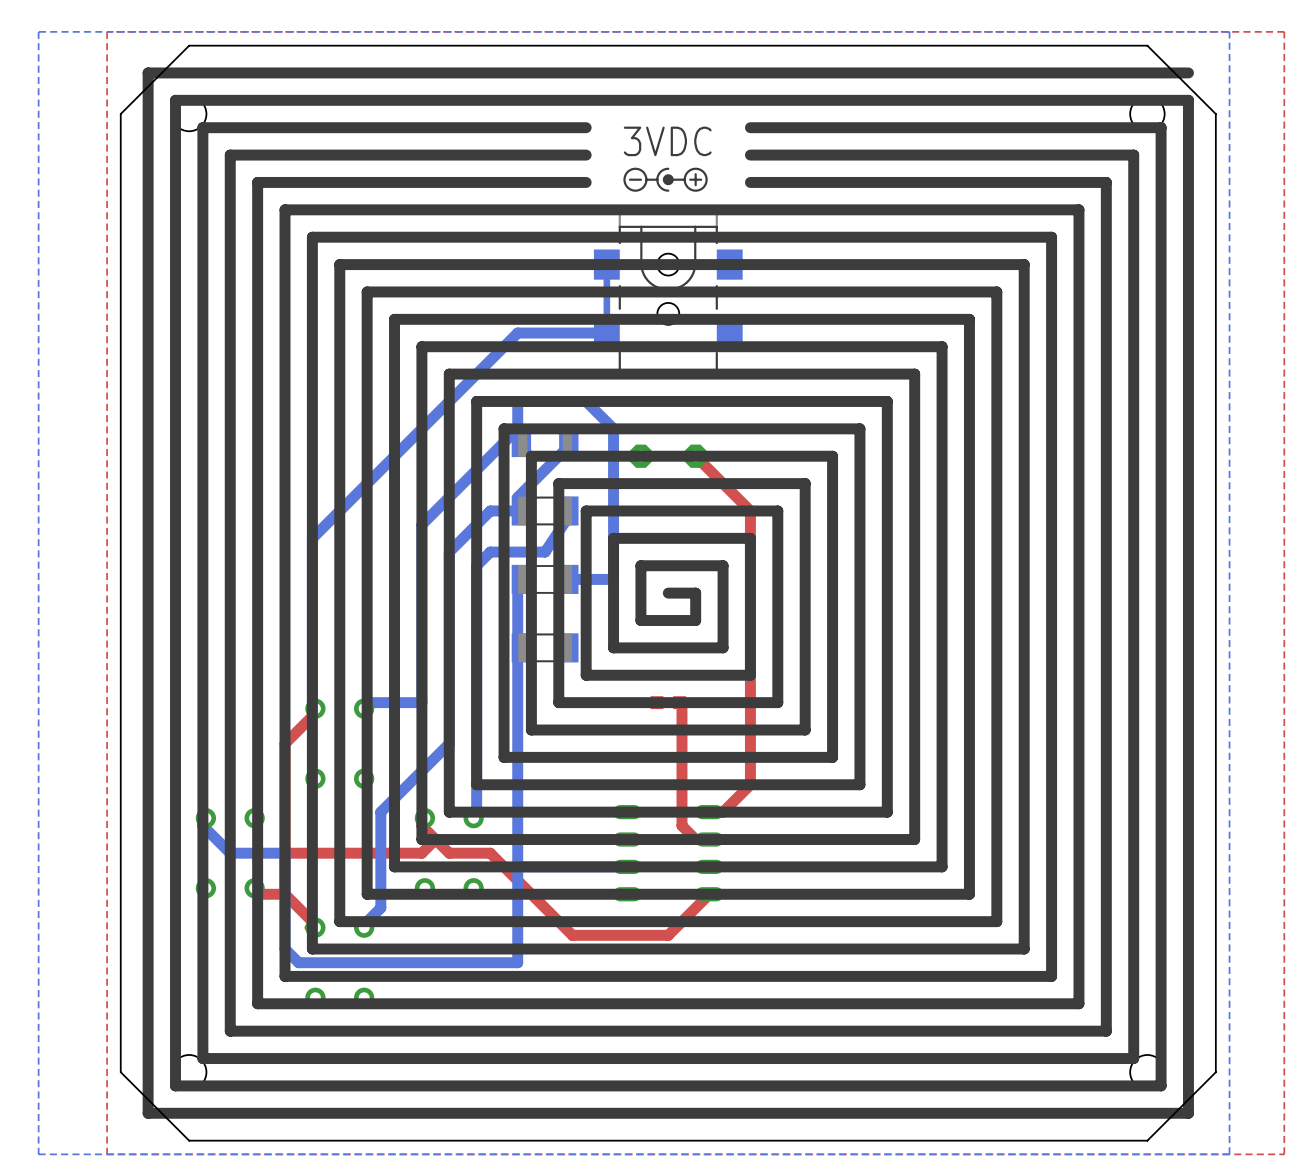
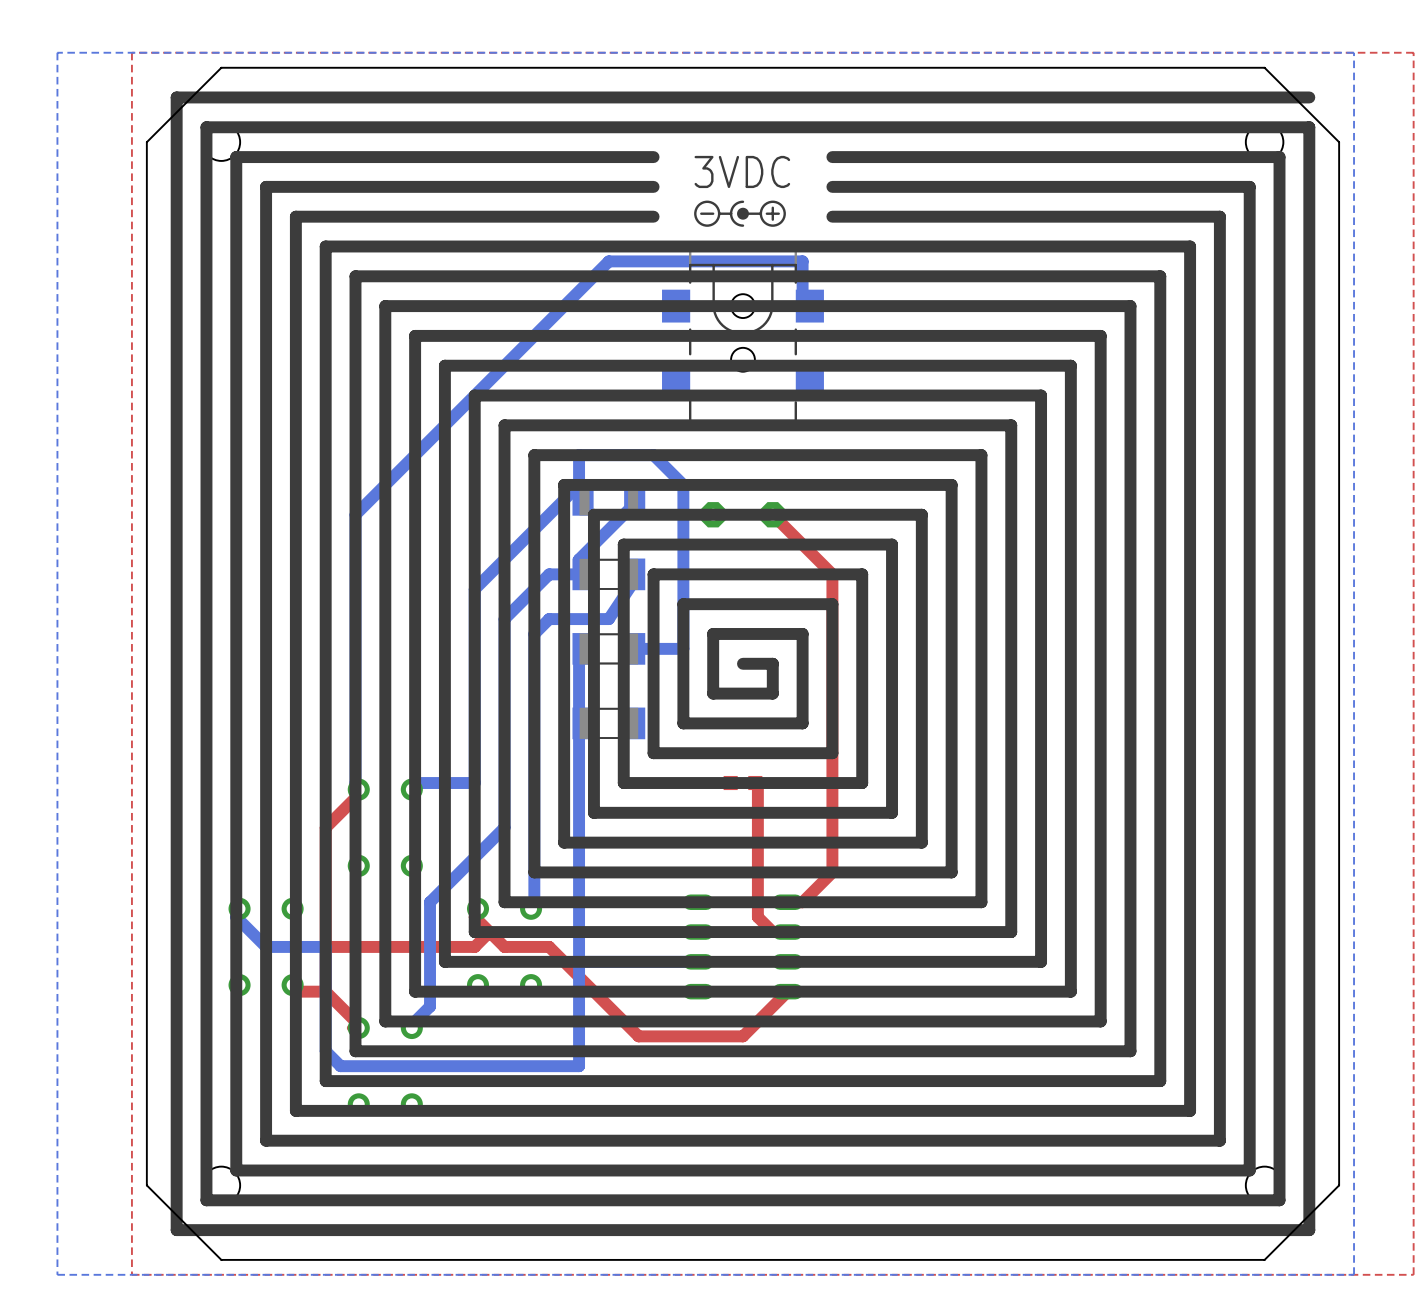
bottom track: (606, 264) (606, 330) (599, 333) (517, 333) (312, 538) -> (809, 306) (802, 306) (802, 261) (608, 261) (355, 514) (355, 604)

